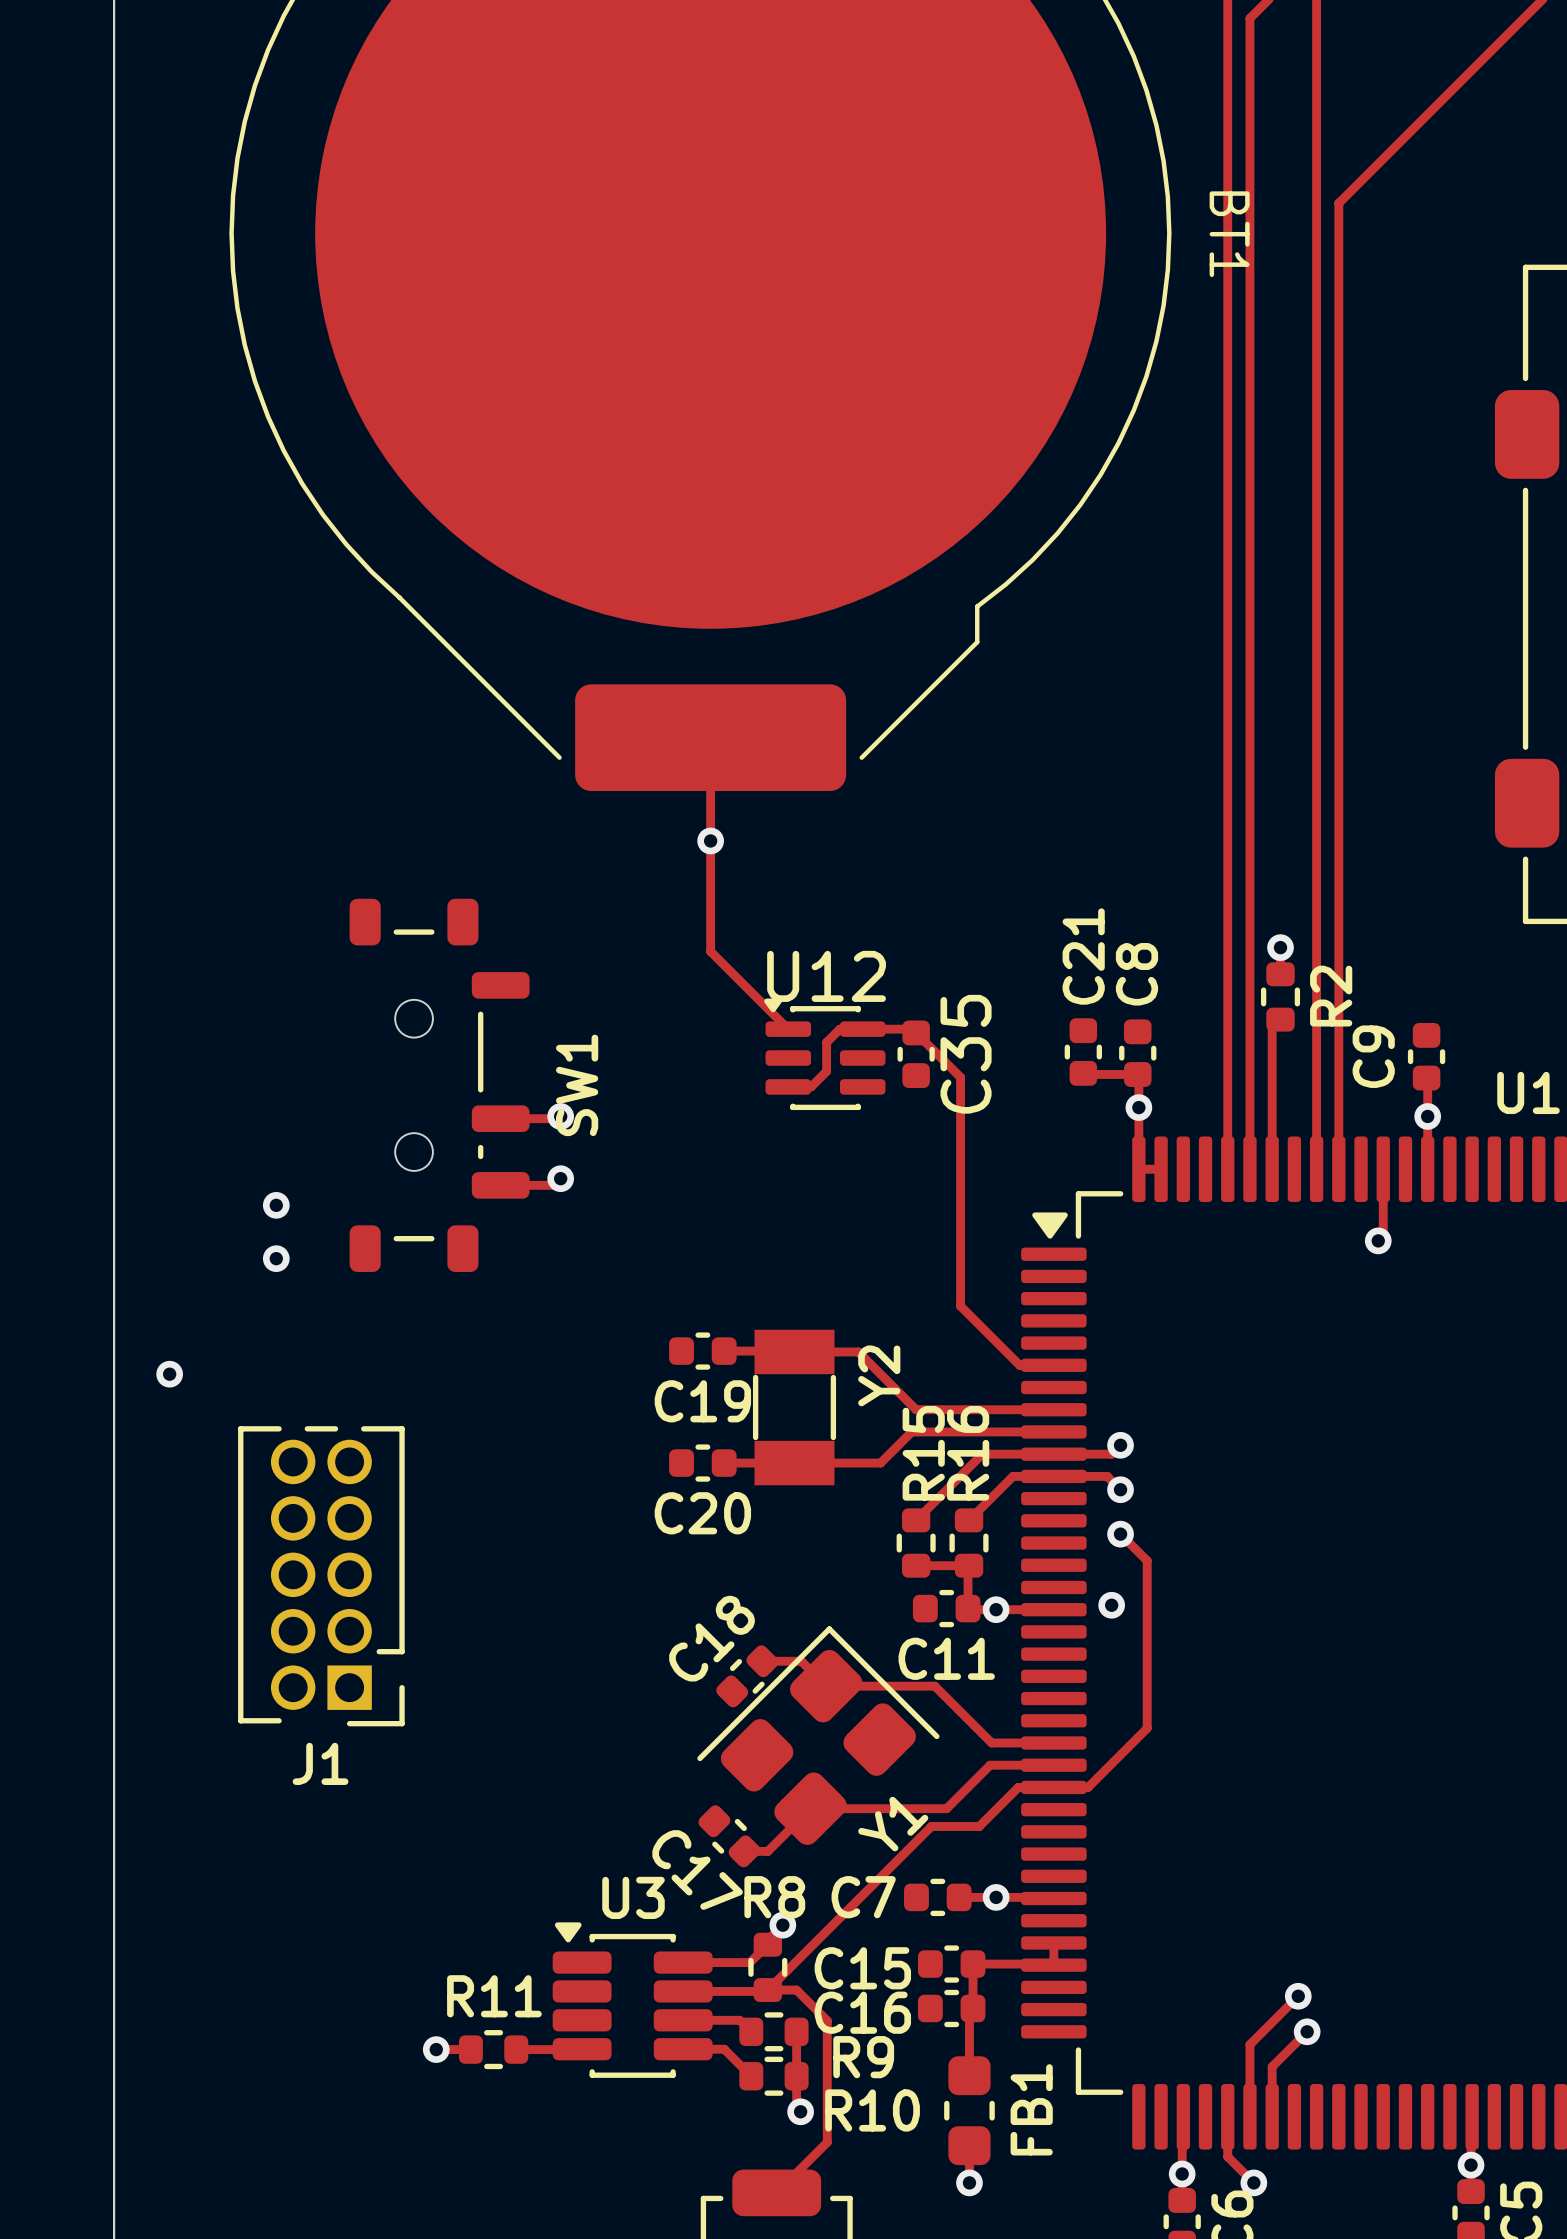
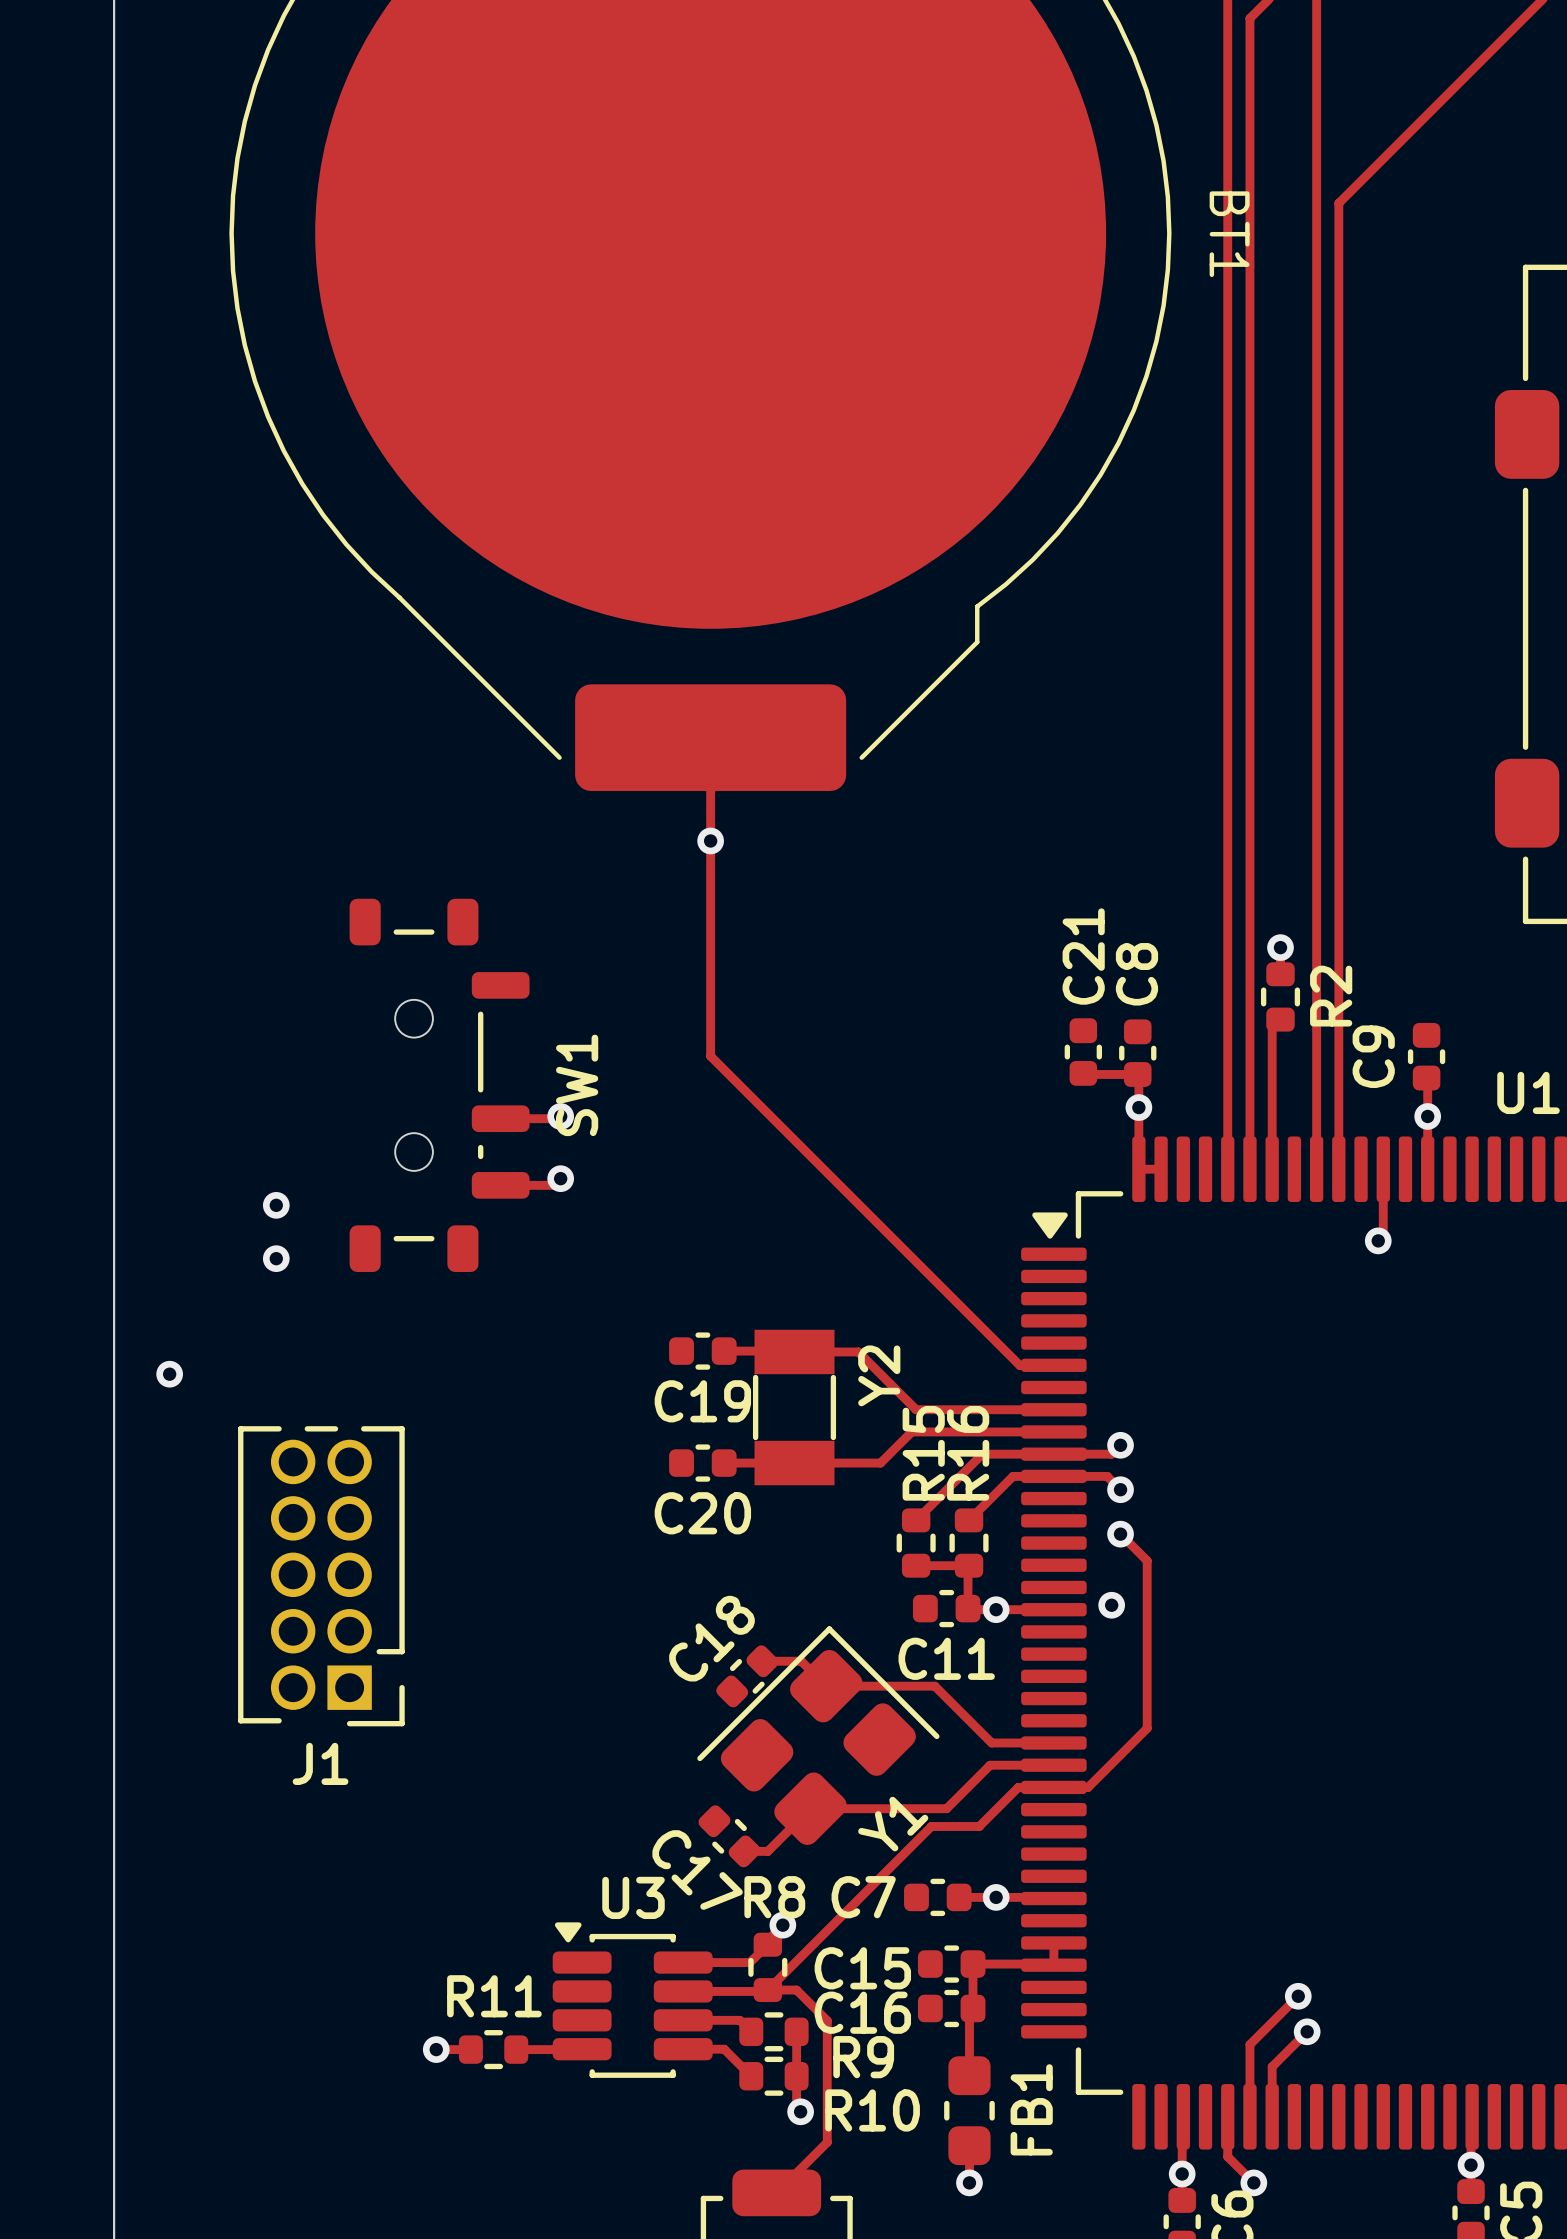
track: (710, 951) (788, 1029) -> none
U12: (824, 1054) -> none
C35: (916, 1054) -> none
track: (788, 1086) (811, 1086) (826, 1071) (826, 1042) (839, 1029) (912, 1029) (960, 1077) (960, 1306) -> (710, 951) (710, 1056) (960, 1306)

